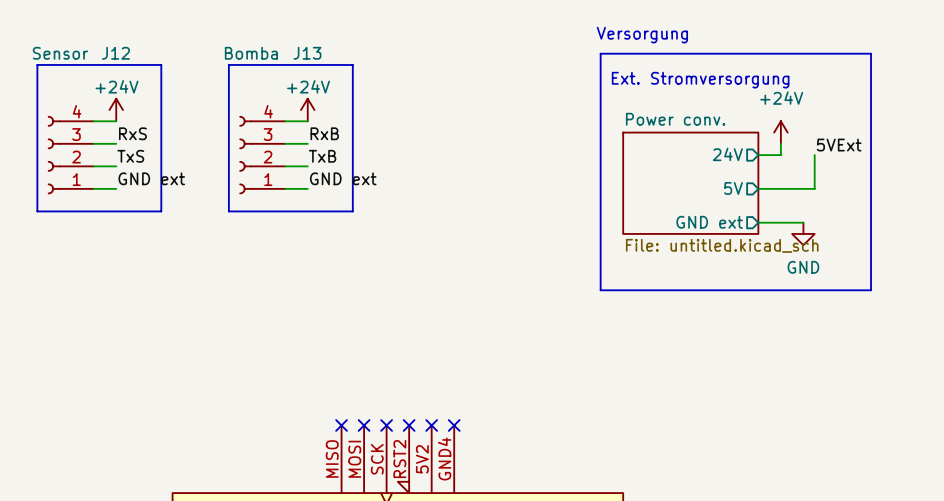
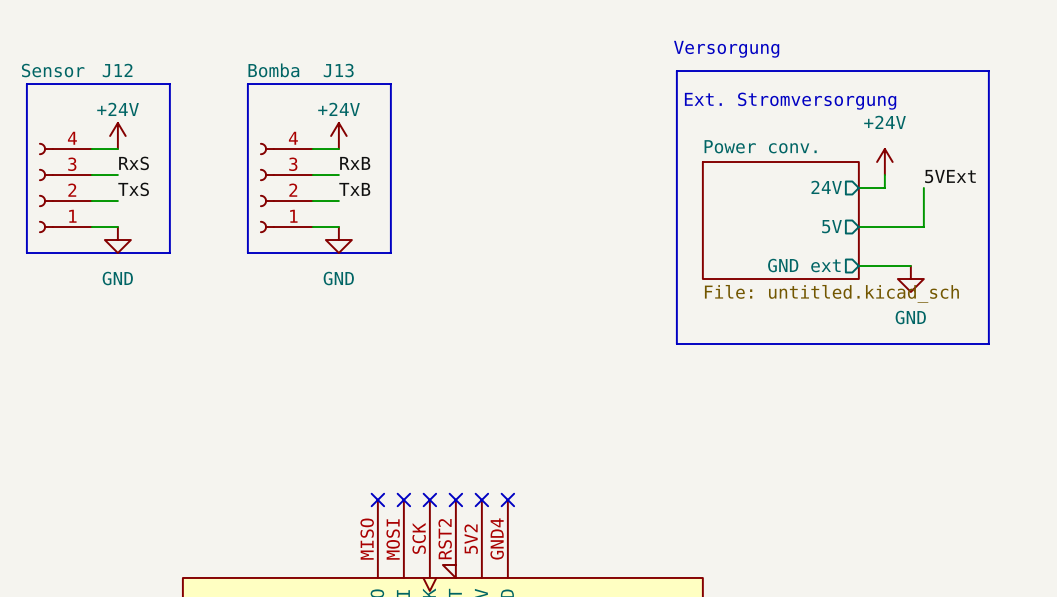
label: GND ext (151, 178) -> none
label: GND ext (343, 178) -> none
power symbol: none -> GND (117, 240)
power symbol: none -> GND (338, 240)

